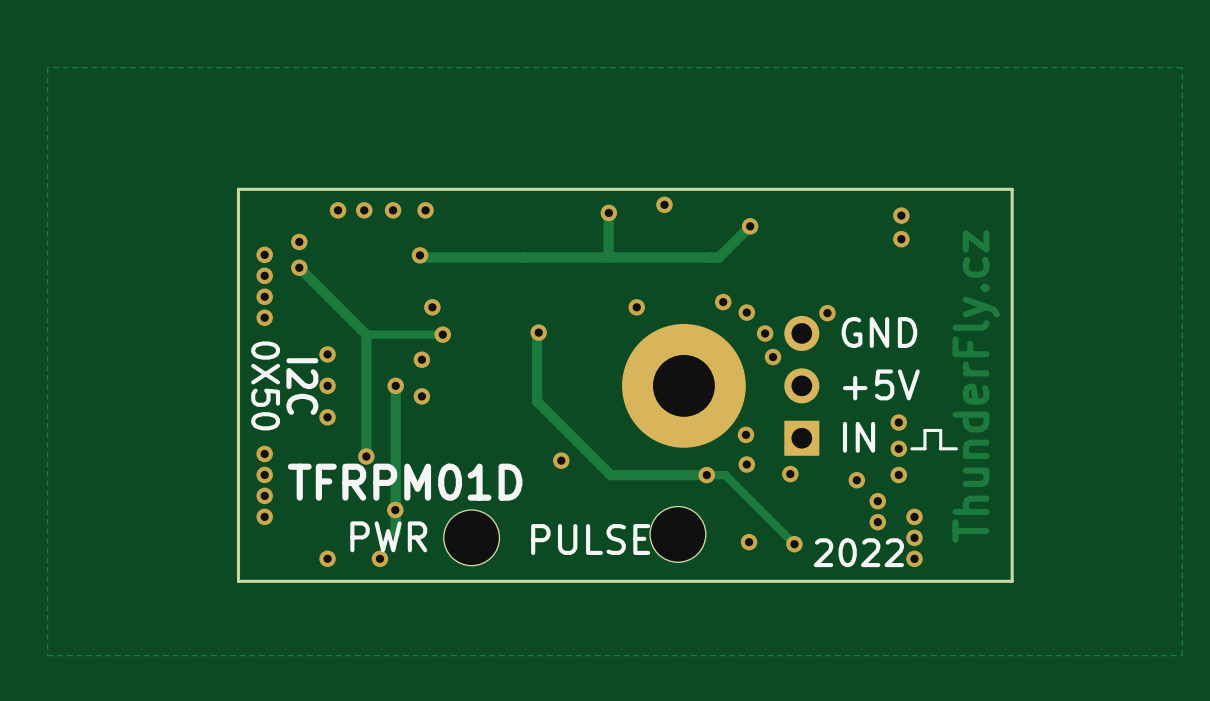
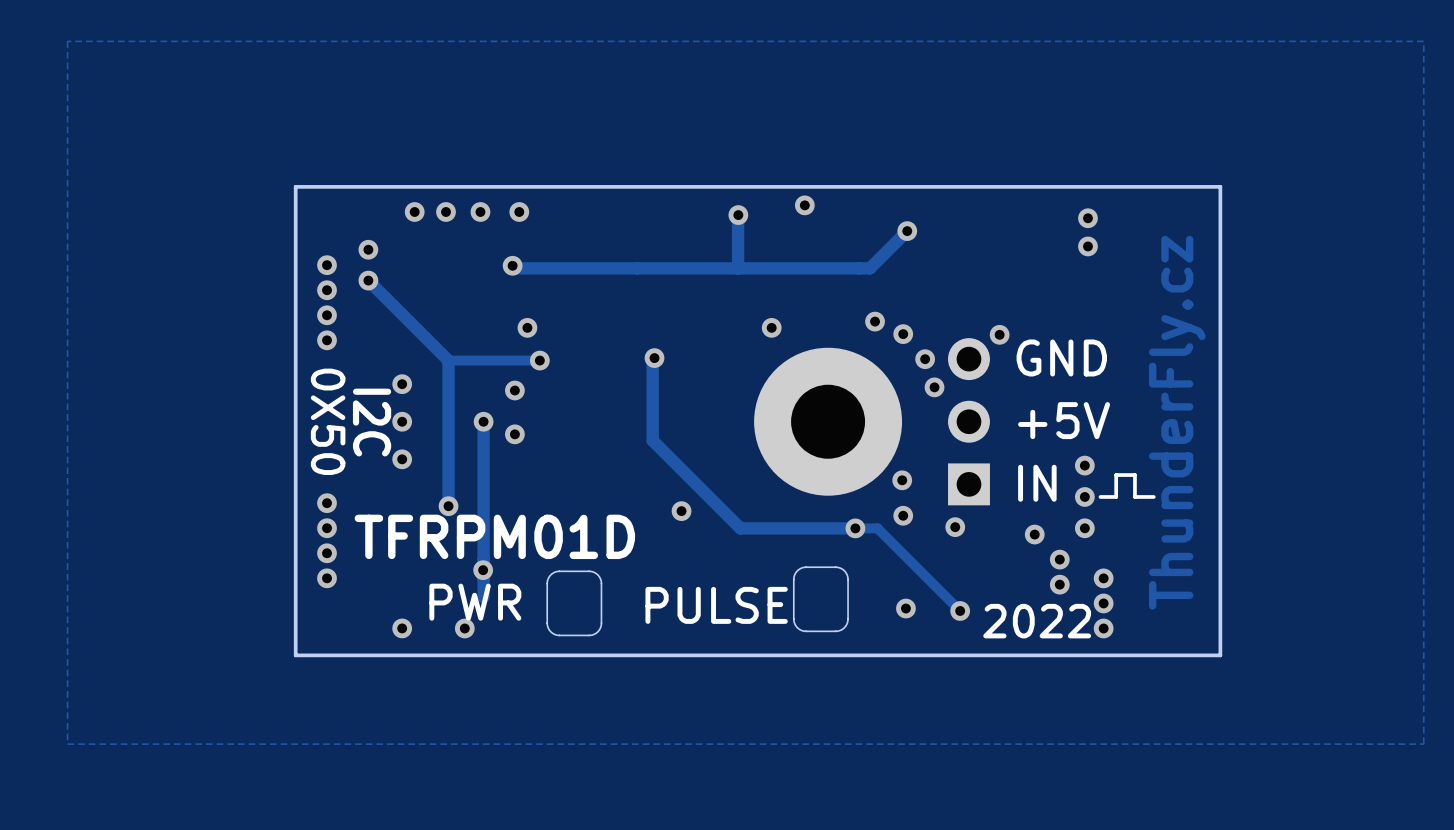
part footprint: [650, 506, 706, 563] -> [793, 566, 849, 632]
part footprint: [443, 509, 500, 566] -> [546, 570, 603, 637]

